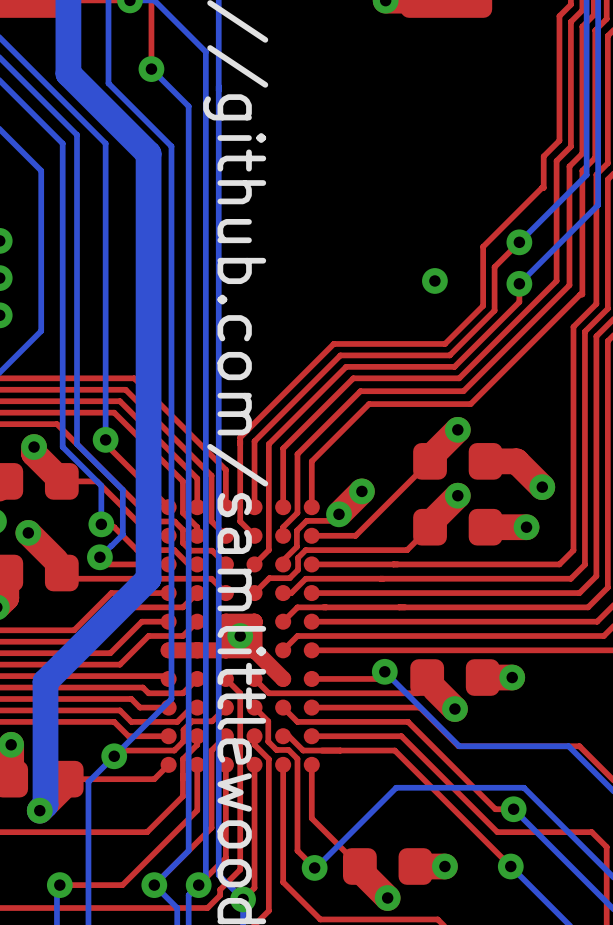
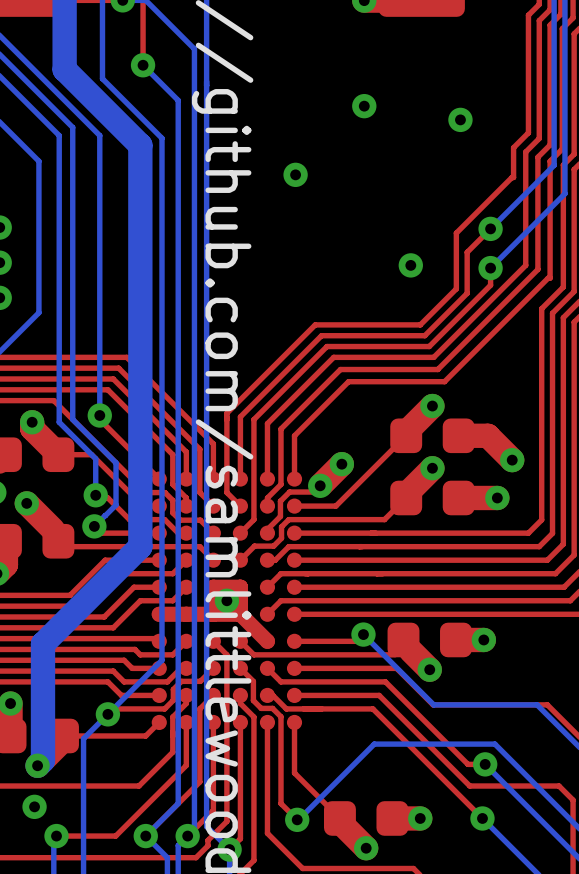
via: none -> (364, 106)
via: none -> (460, 119)
via: none -> (295, 174)
via: none -> (34, 806)

